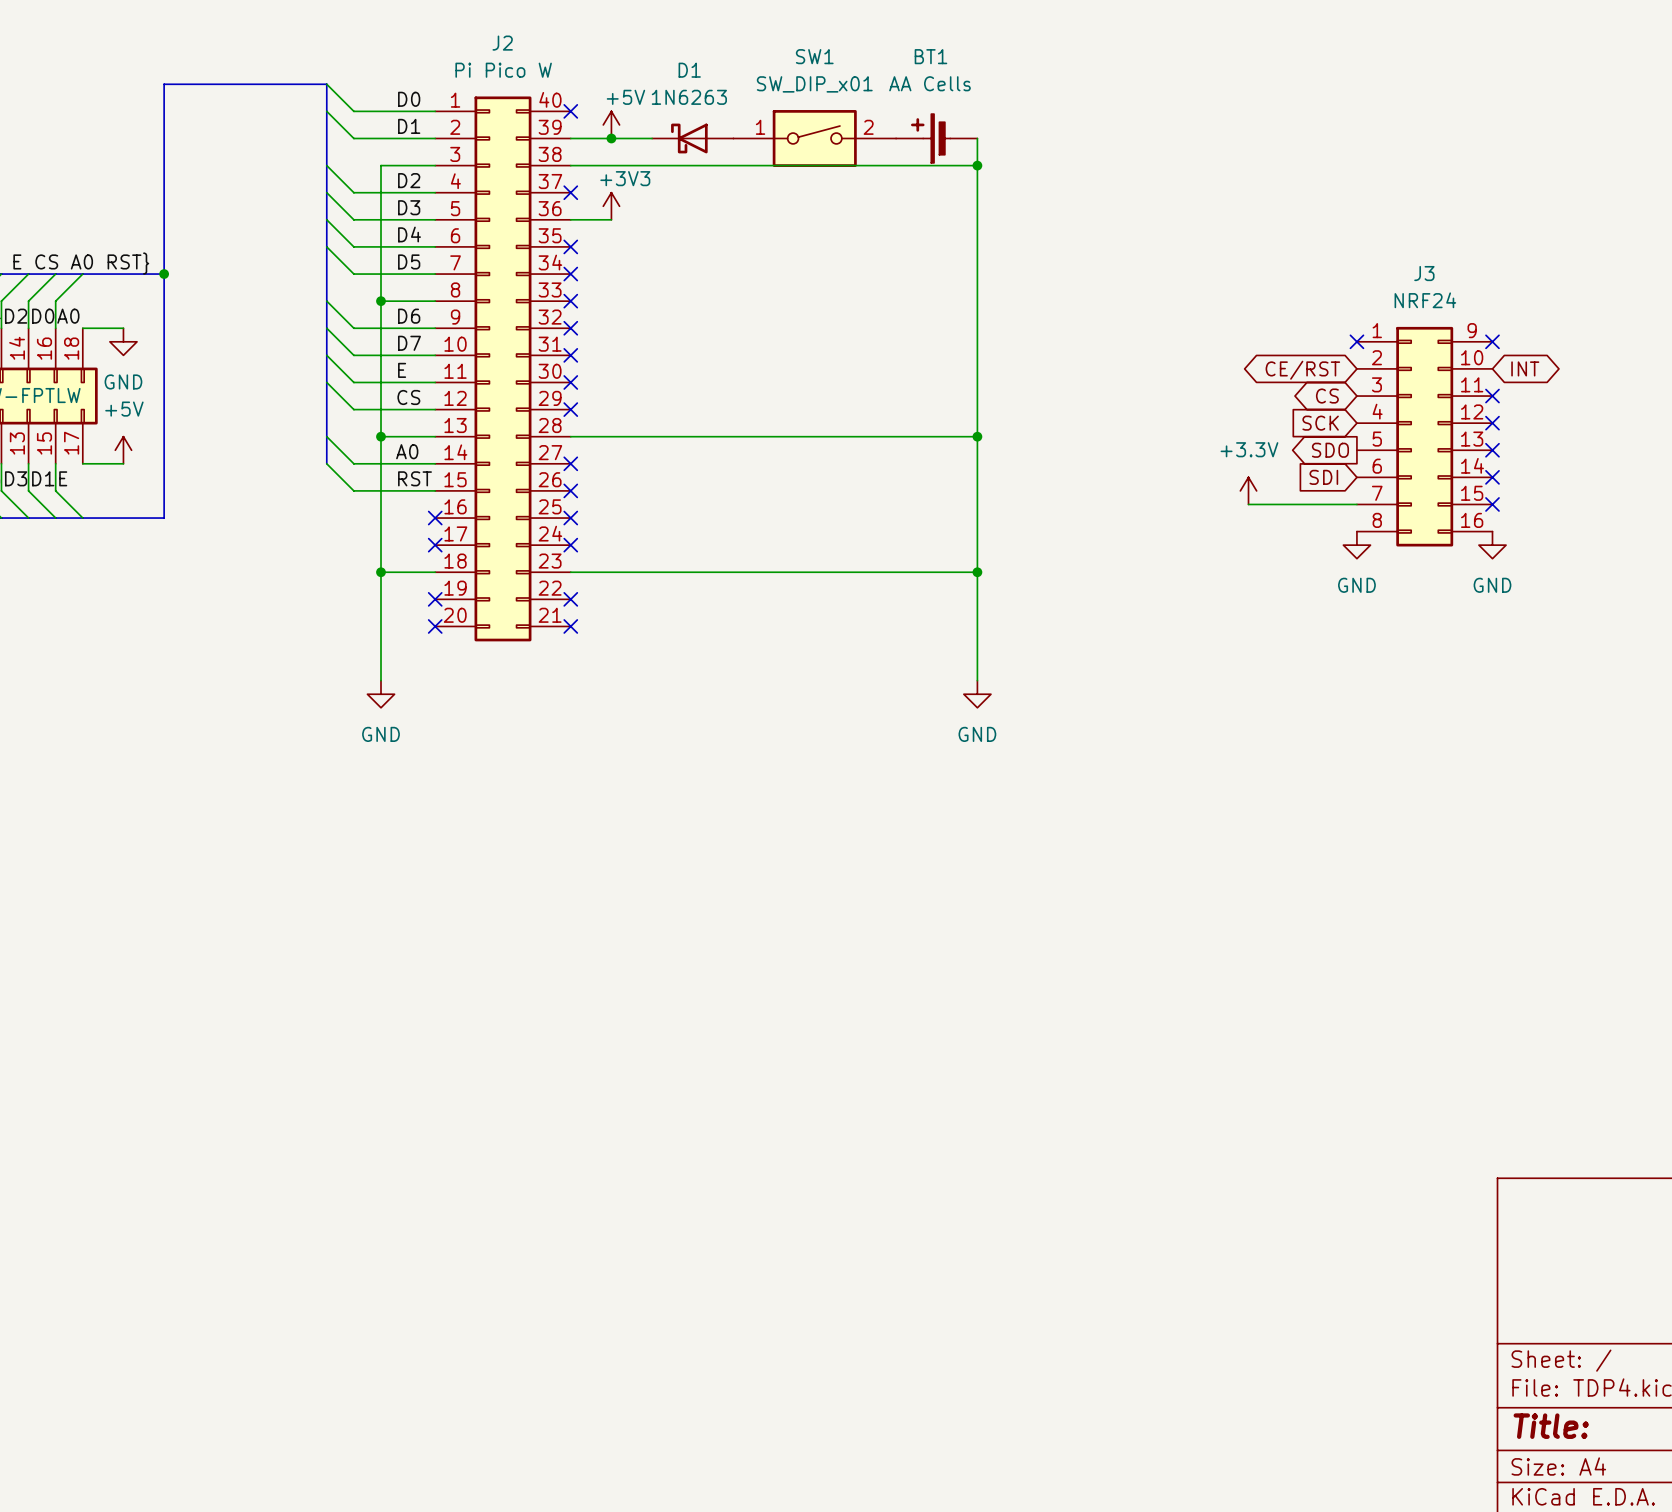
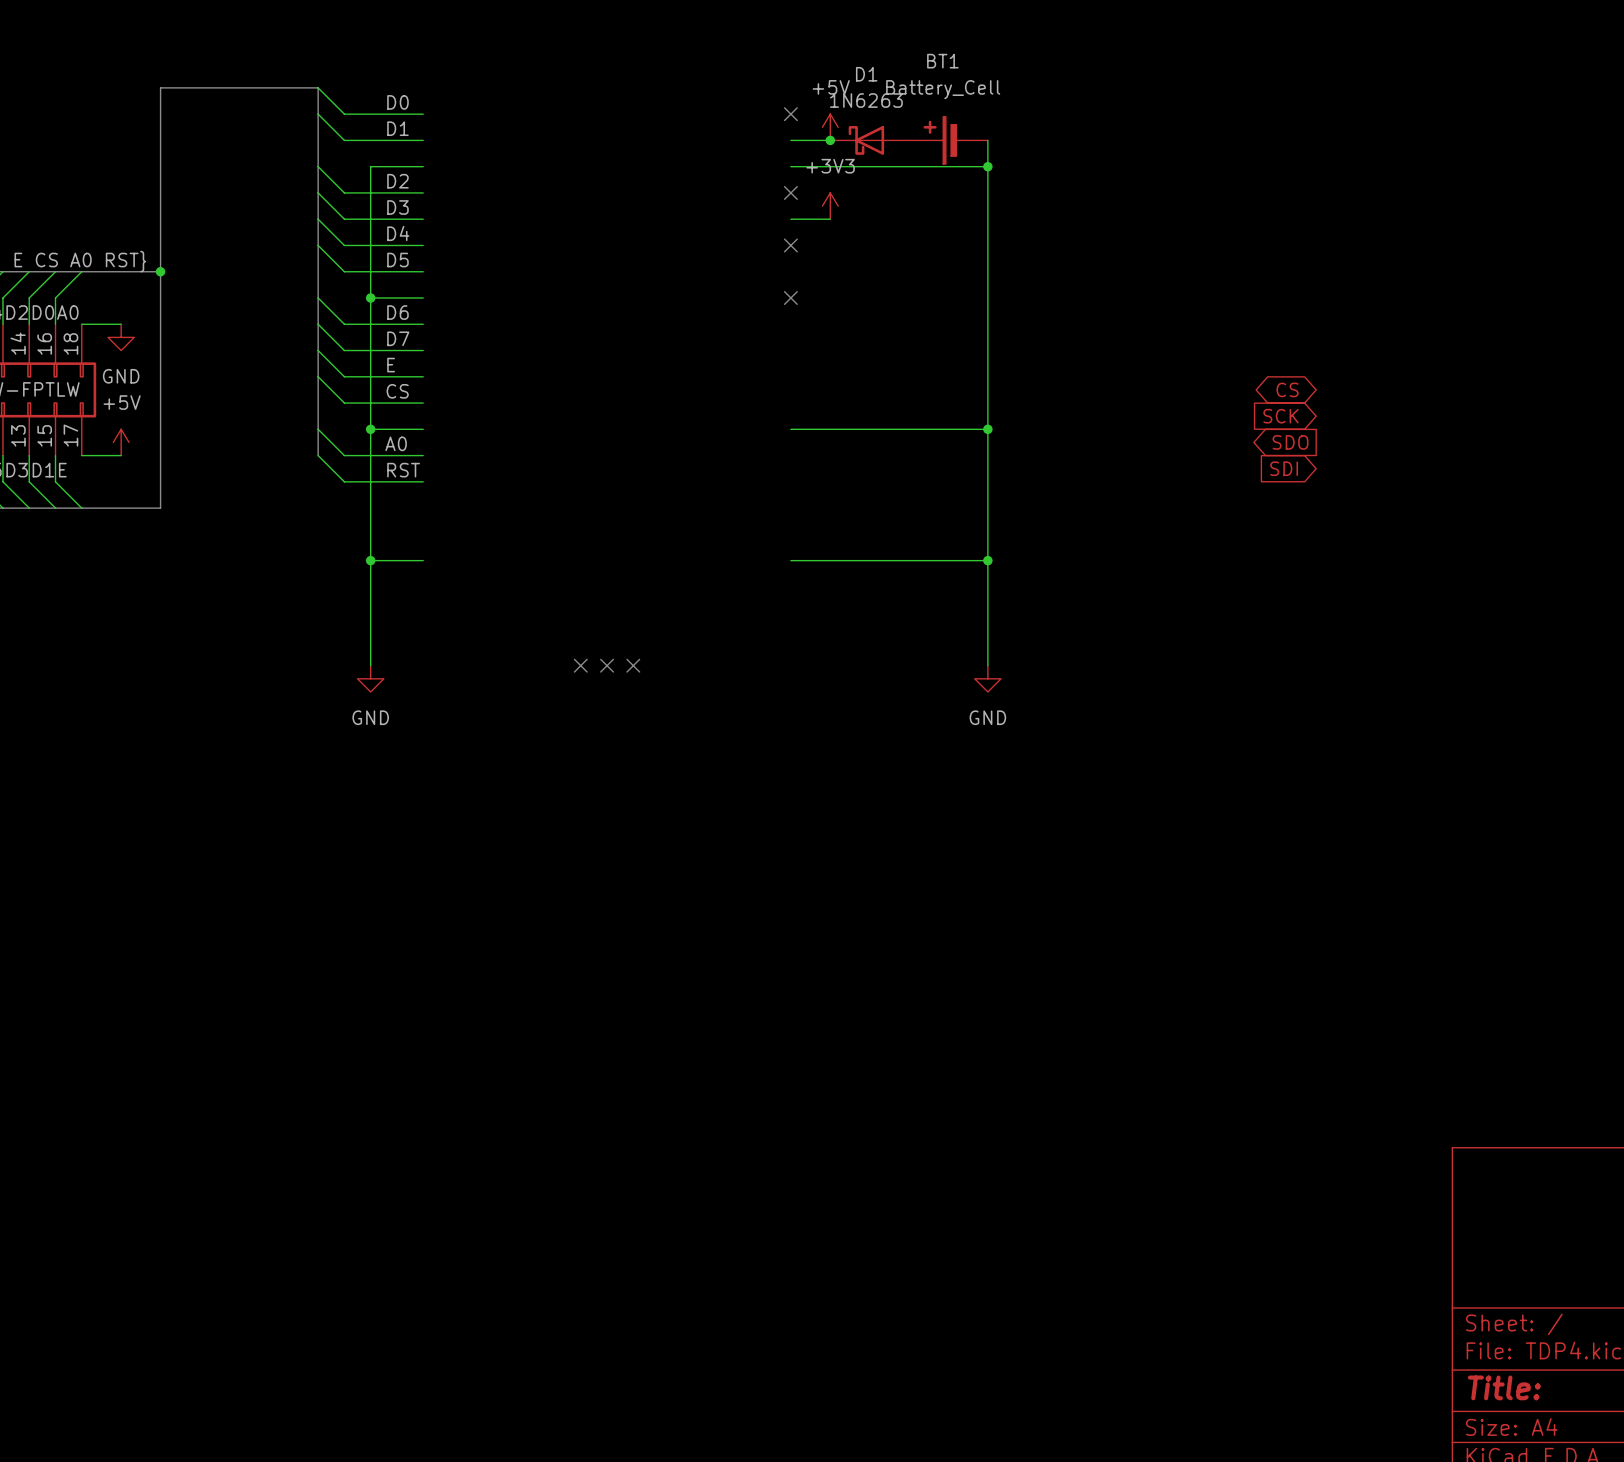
BT1 value: AA Cells (930, 83) -> Battery_Cell (943, 89)
power symbol text position: +5V (625, 97) -> +5V (831, 87)
no-connect mark: (570, 111) -> none
no-connect mark: none -> (790, 114)
power symbol position: +5V (611, 124) -> +5V (830, 127)
wire: (570, 138) (652, 138) -> none
junction: (611, 138) -> none
D1 position: (692, 138) -> (869, 140)
SW1: SW_DIP_x01 (814, 138) -> none
junction: none -> (830, 140)
BT1 position: (936, 138) -> (948, 140)
wire: (977, 138) (977, 680) -> (987, 140) (987, 665)
wire: (570, 165) (814, 165) -> none
wire: none -> (948, 166) (987, 166)
junction position: (977, 165) -> (987, 166)
power symbol text position: +3V3 (625, 178) -> +3V3 (830, 166)
no-connect mark: (570, 192) -> none
no-connect mark: none -> (790, 192)
power symbol position: +3V3 (611, 206) -> +3V3 (830, 206)
wire: (570, 219) (611, 219) -> (790, 219) (830, 219)
no-connect mark: (570, 246) -> none
no-connect mark: none -> (790, 245)
no-connect mark: (570, 274) -> none
no-connect mark: (570, 301) -> none
no-connect mark: none -> (790, 298)
no-connect mark: (570, 328) -> none
no-connect mark: (1356, 341) -> none
no-connect mark: (1492, 341) -> none
no-connect mark: (570, 355) -> none
J2: Pi Pico W (502, 368) -> none
global label: INT (1525, 368) -> none
global label: CE/RST (1302, 370) -> none
no-connect mark: (570, 382) -> none
no-connect mark: (1492, 396) -> none
no-connect mark: (570, 409) -> none
no-connect mark: (1492, 423) -> none
wire: (570, 436) (814, 436) -> none
wire: none -> (948, 429) (987, 429)
junction position: (977, 436) -> (987, 429)
J3: NRF24 (1424, 436) -> none
no-connect mark: (1492, 450) -> none
no-connect mark: (570, 463) -> none
no-connect mark: (1492, 477) -> none
no-connect mark: (570, 490) -> none
power symbol: +3.3V (1248, 490) -> none
wire: (1248, 504) (1356, 504) -> none
no-connect mark: (1492, 504) -> none
no-connect mark: (435, 518) -> none
no-connect mark: (570, 518) -> none
no-connect mark: (435, 545) -> none
no-connect mark: (570, 545) -> none
power symbol: GND (1356, 545) -> none
power symbol: GND (1492, 545) -> none
wire: (570, 572) (814, 572) -> none
wire: none -> (948, 560) (987, 560)
junction position: (977, 572) -> (987, 560)
no-connect mark: (435, 599) -> none
no-connect mark: (570, 599) -> none
no-connect mark: (435, 626) -> none
no-connect mark: (570, 626) -> none
no-connect mark: none -> (580, 665)
no-connect mark: none -> (607, 665)
no-connect mark: none -> (633, 665)
power symbol position: GND (977, 694) -> GND (987, 678)

